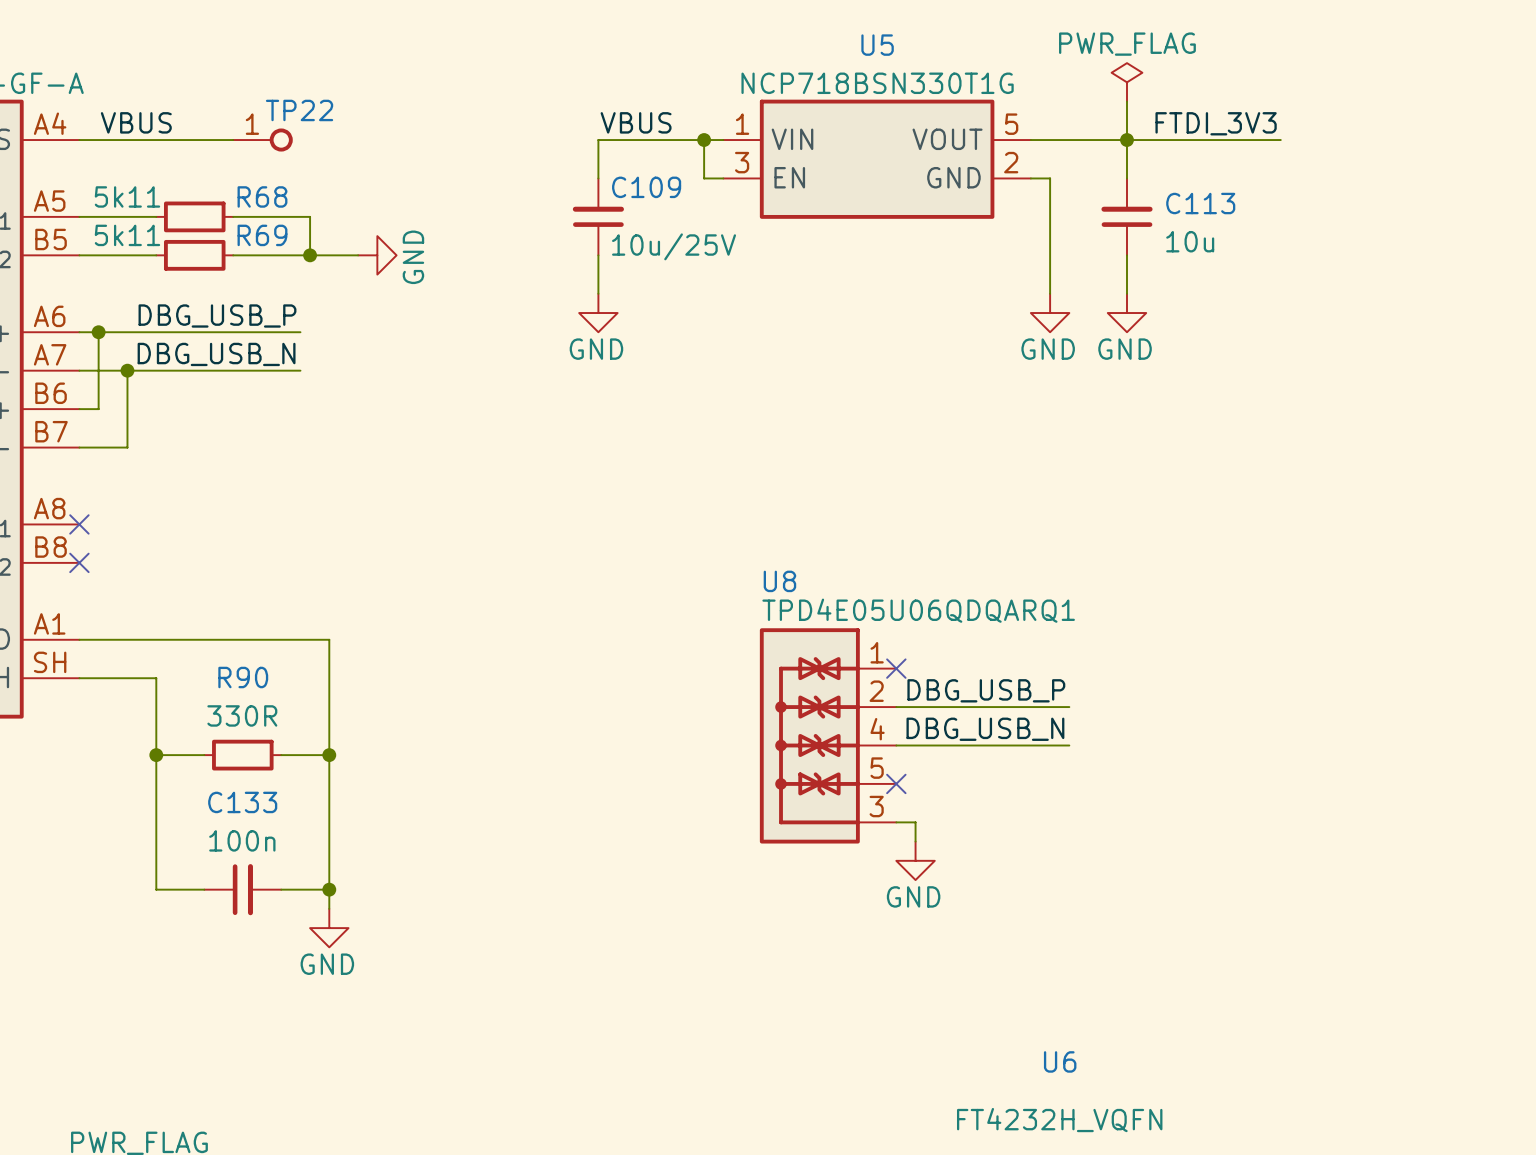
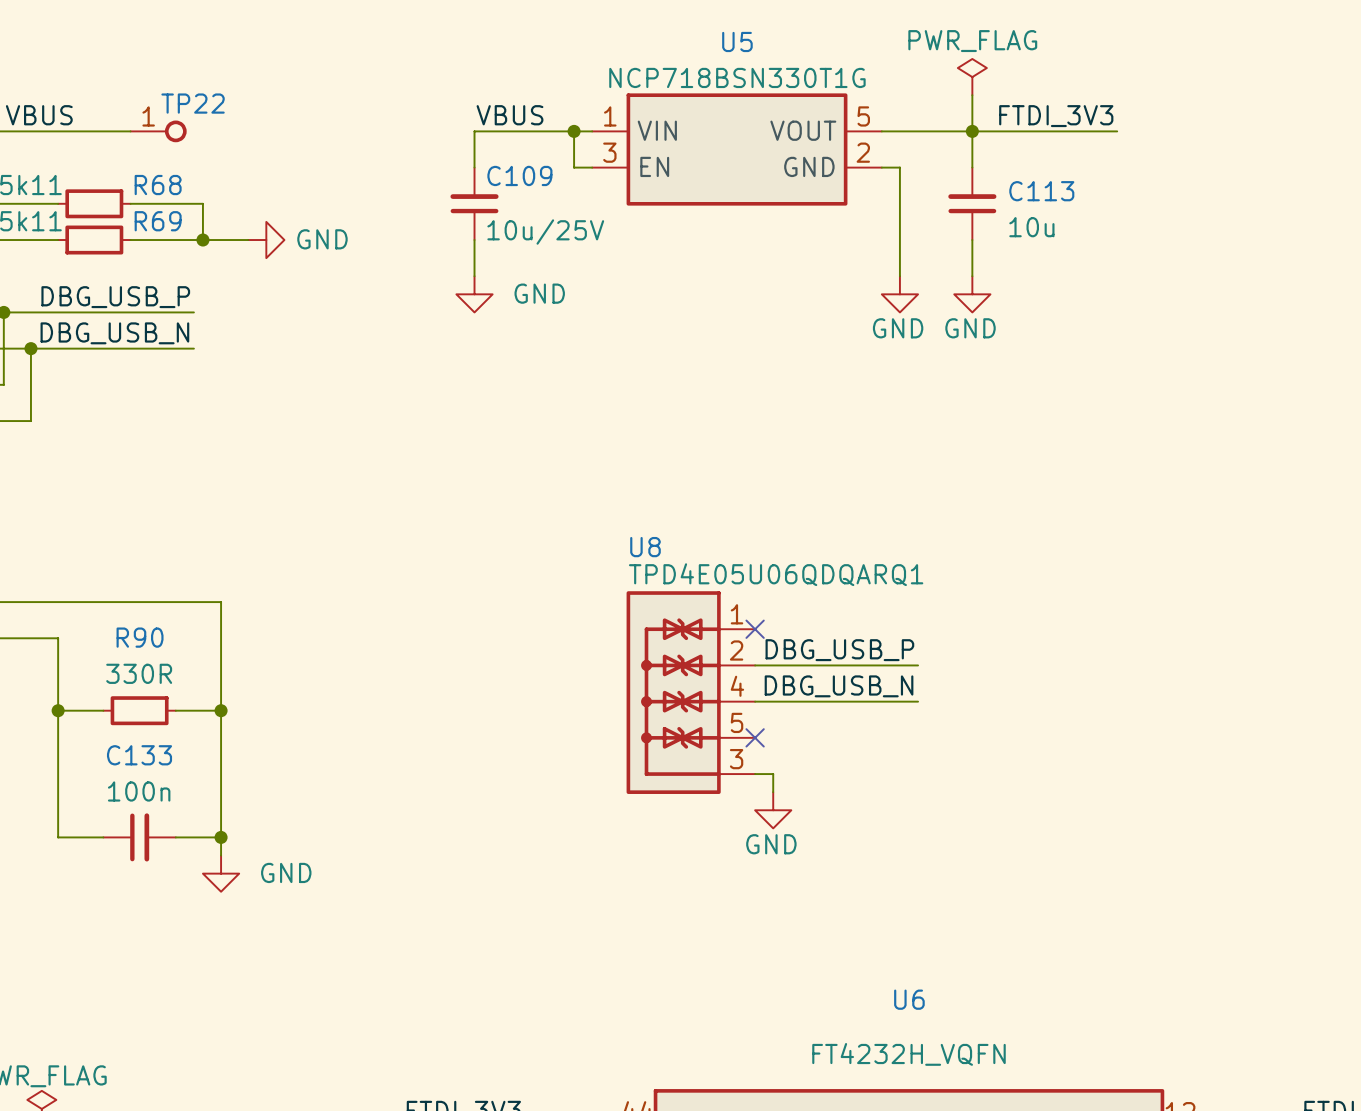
power symbol text rotation: 0° (413, 257) -> 90° clockwise (322, 239)
power symbol text position: GND (596, 349) -> GND (539, 293)
power symbol text position: GND (327, 964) -> GND (286, 872)

